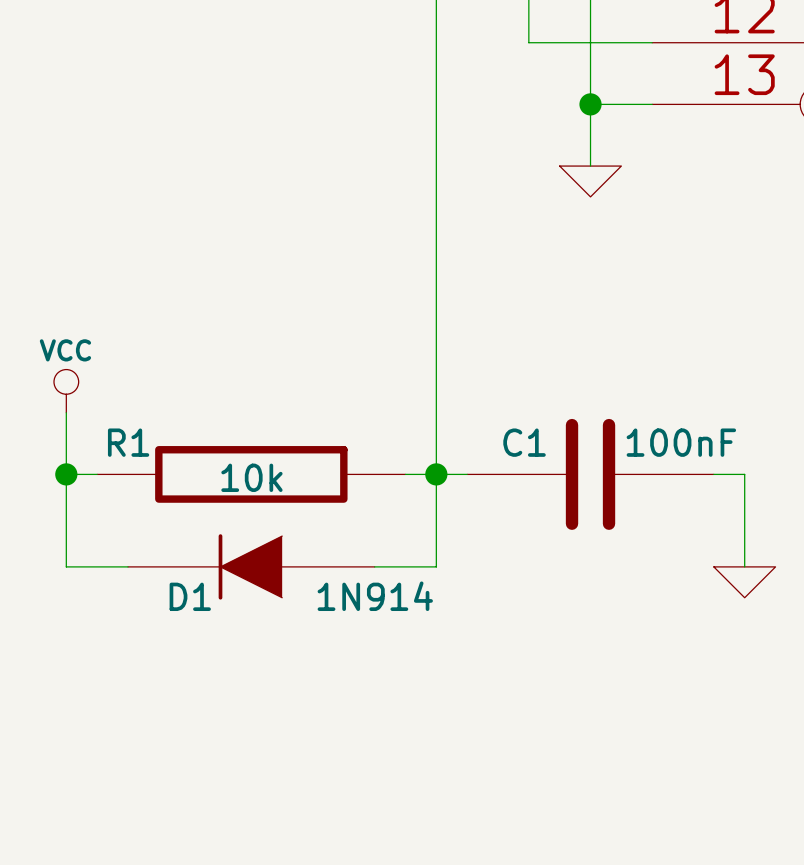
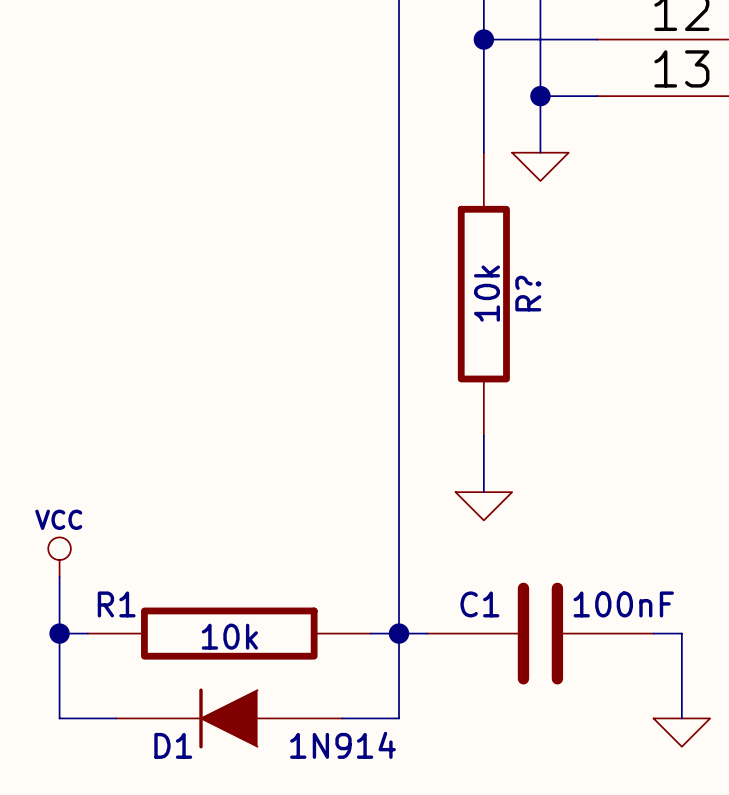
wire: none -> (483, 39) (483, 152)
junction: none -> (483, 39)
R?: none -> 10k (483, 294)
power symbol position: VCC (66, 391) -> VCC (59, 557)
wire: (66, 412) (66, 566) (127, 566) -> (59, 577) (59, 718) (116, 718)
wire: (66, 474) (97, 474) -> (59, 633) (87, 633)
junction: (66, 474) -> none
R1 position: (251, 474) -> (229, 633)
wire: (405, 474) (467, 474) -> (370, 633) (427, 633)
junction: (436, 474) -> none
wire: none -> (483, 435) (483, 492)
C1 position: (590, 474) -> (540, 633)
wire: (713, 474) (744, 474) (744, 566) -> (653, 633) (681, 633) (681, 718)
power symbol: none -> (483, 506)
D1 position: (251, 566) -> (229, 718)
wire: (374, 566) (436, 566) -> (342, 718) (399, 718) (399, 520)
power symbol: (744, 582) -> none
junction: none -> (59, 633)
junction: none -> (399, 633)
power symbol: none -> (681, 732)

